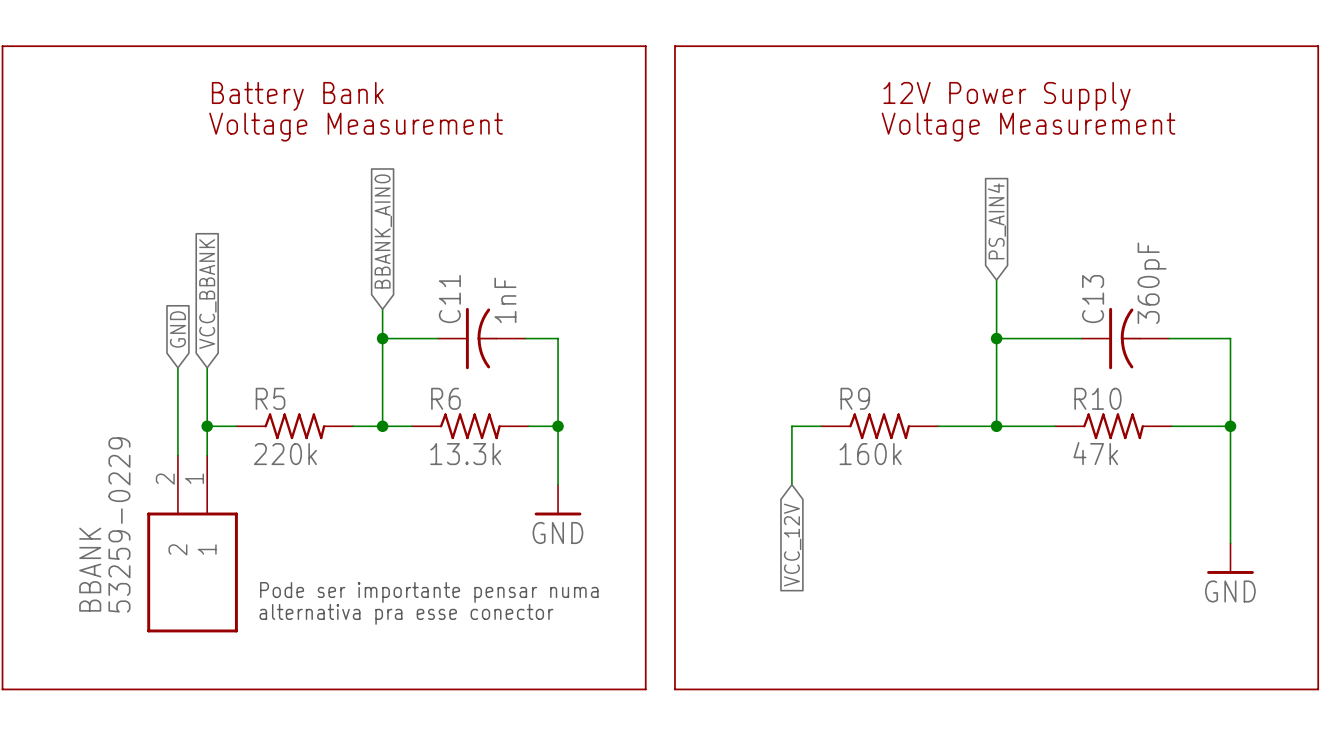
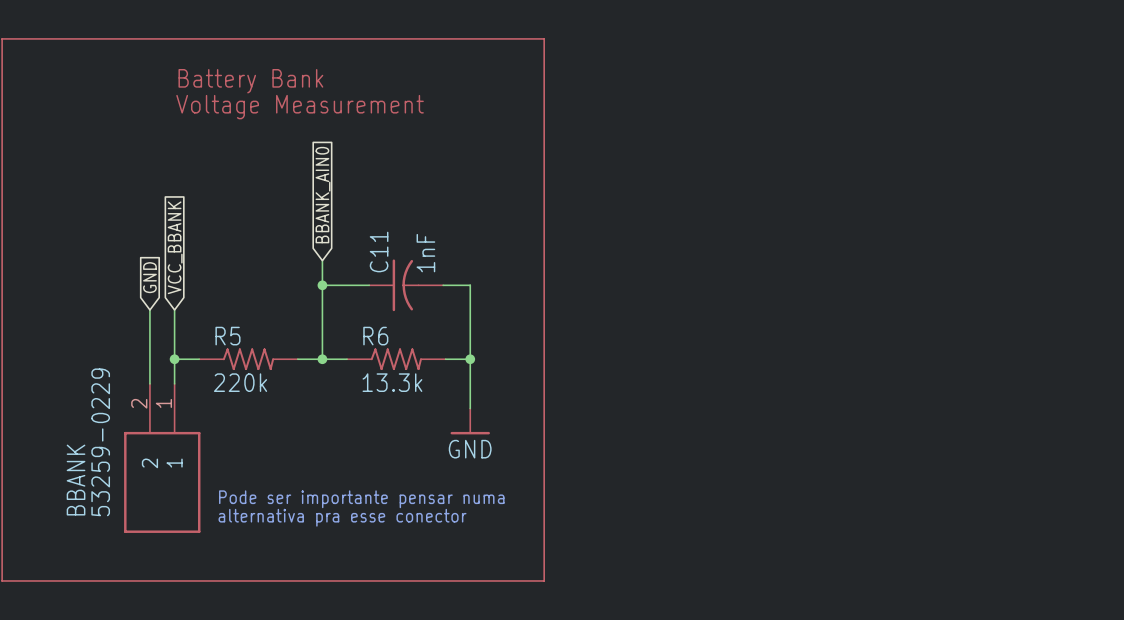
line: (674, 46) (674, 689) (1318, 689) (1318, 46) (674, 46) -> none
text: 12V Power Supply (1007, 96) -> none
text: Voltage Measurement (1028, 127) -> none
global label: PS_AIN4 (996, 221) -> none
wire: (996, 280) (996, 426) -> none
wire: (996, 338) (1081, 338) -> none
junction: (996, 338) -> none
C13: 360pF (1125, 338) -> none
wire: (1169, 338) (1230, 338) (1230, 543) -> none
wire: (821, 426) (791, 426) (791, 484) -> none
R9: 160k (879, 426) -> none
wire: (938, 426) (1055, 426) -> none
junction: (996, 426) -> none
R10: 47k (1113, 426) -> none
wire: (1172, 426) (1230, 426) -> none
junction: (1230, 426) -> none
global label: VCC_12V (792, 545) -> none
power symbol: GND (1230, 558) -> none

